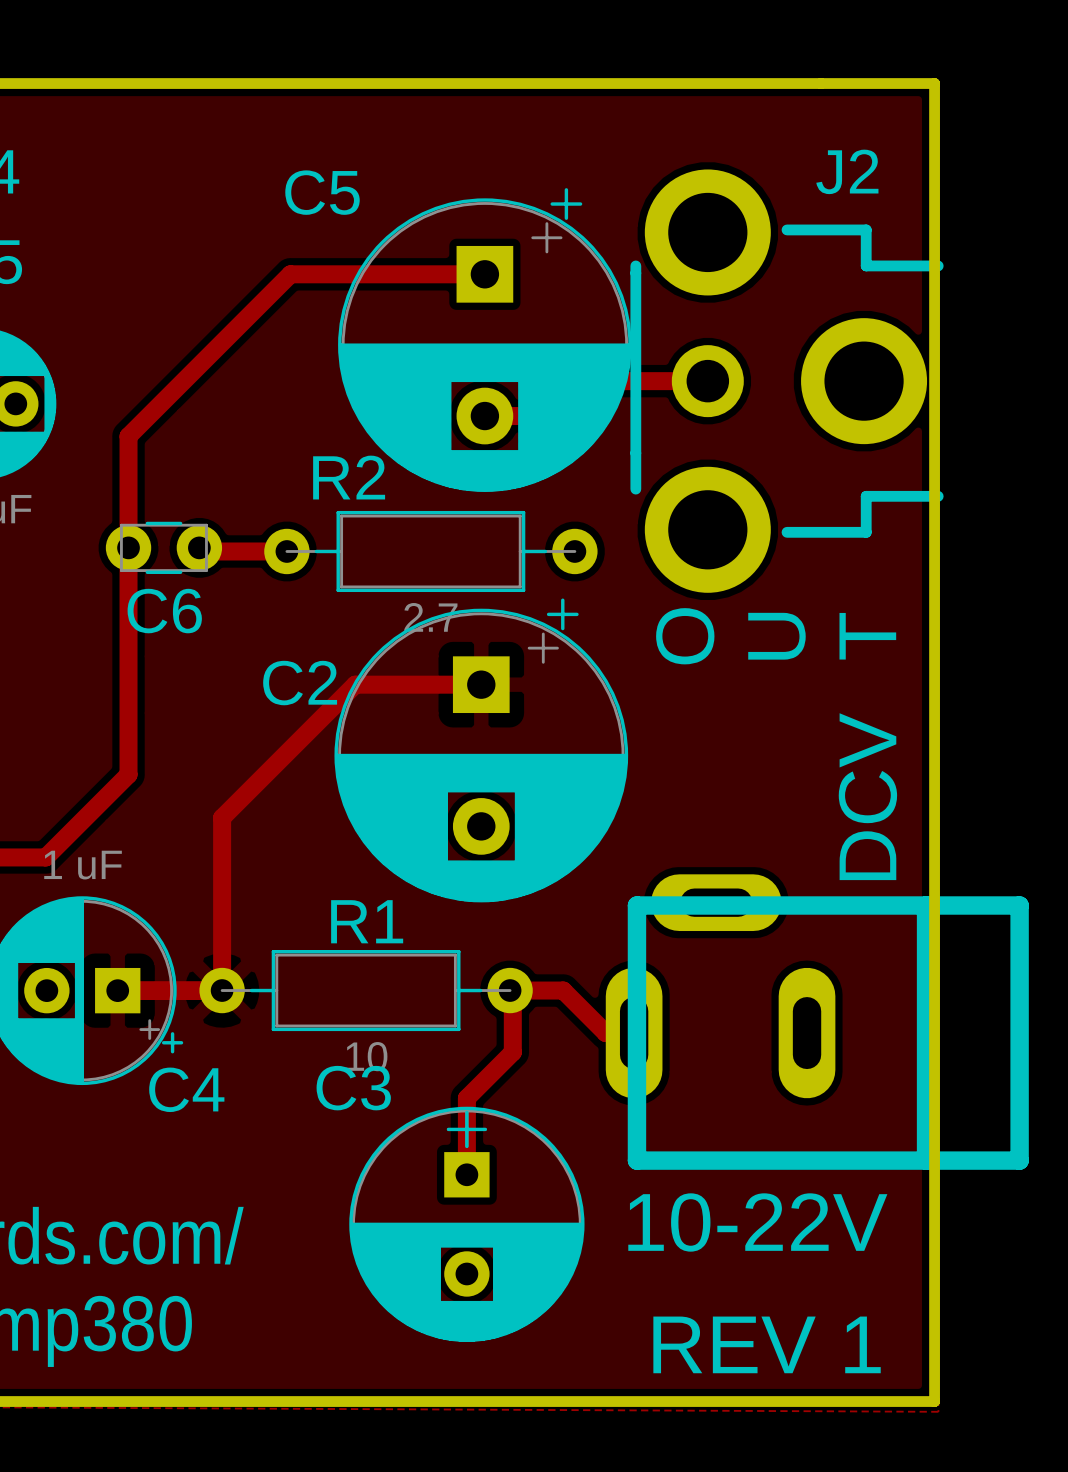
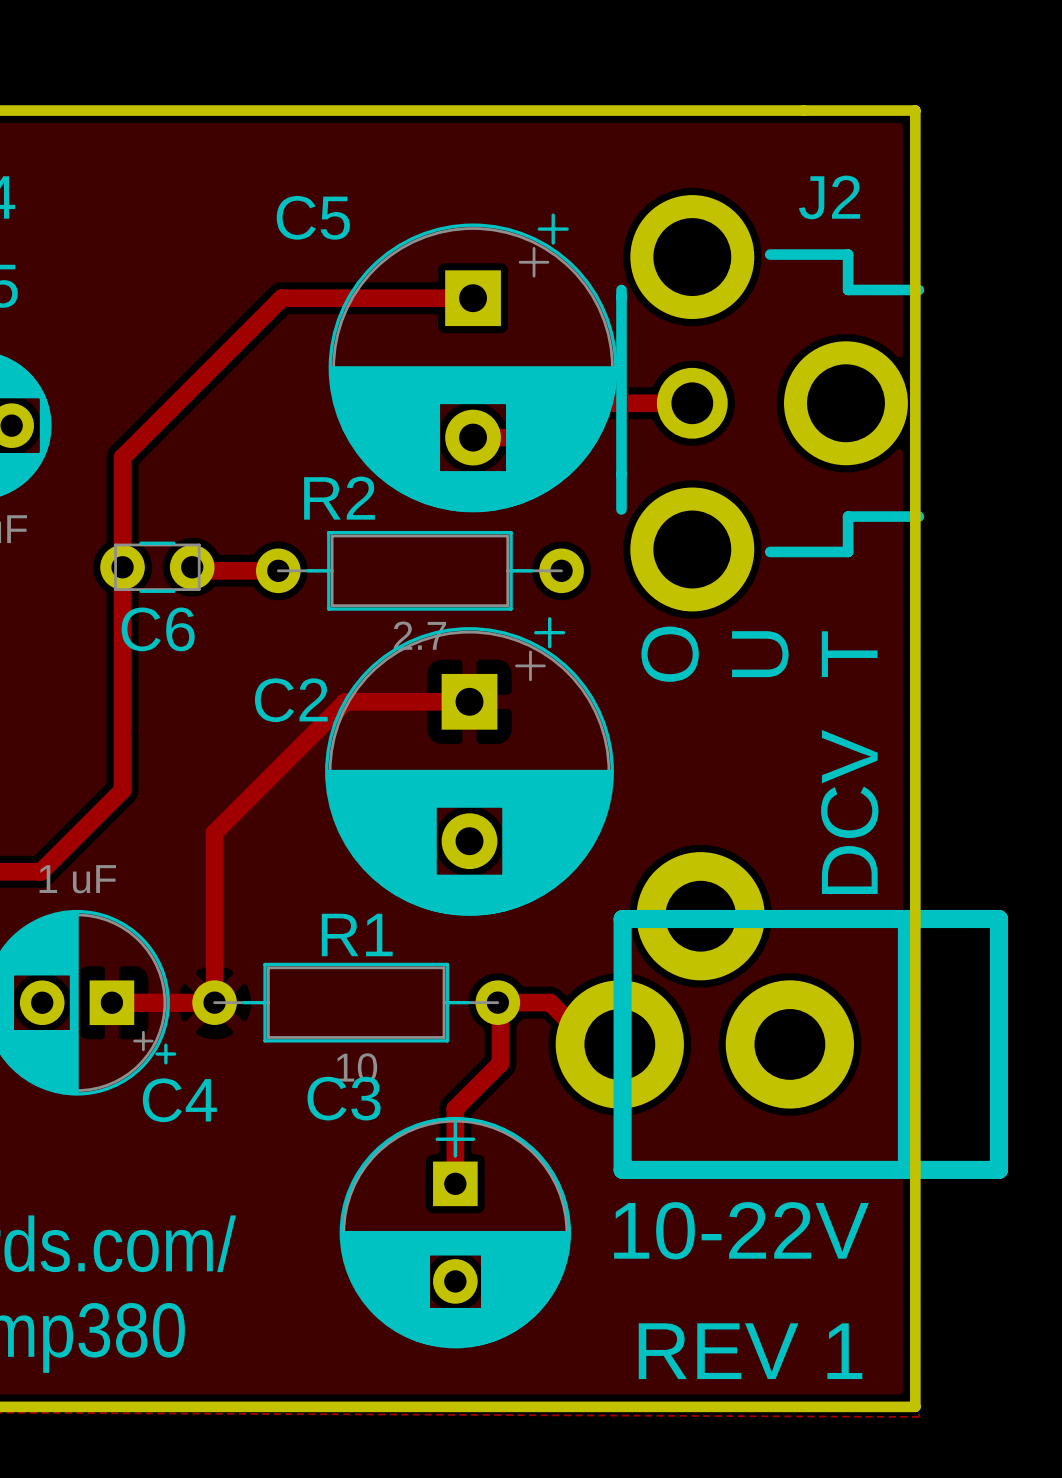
part footprint: [605, 874, 1029, 1170] -> [555, 852, 1009, 1179]

